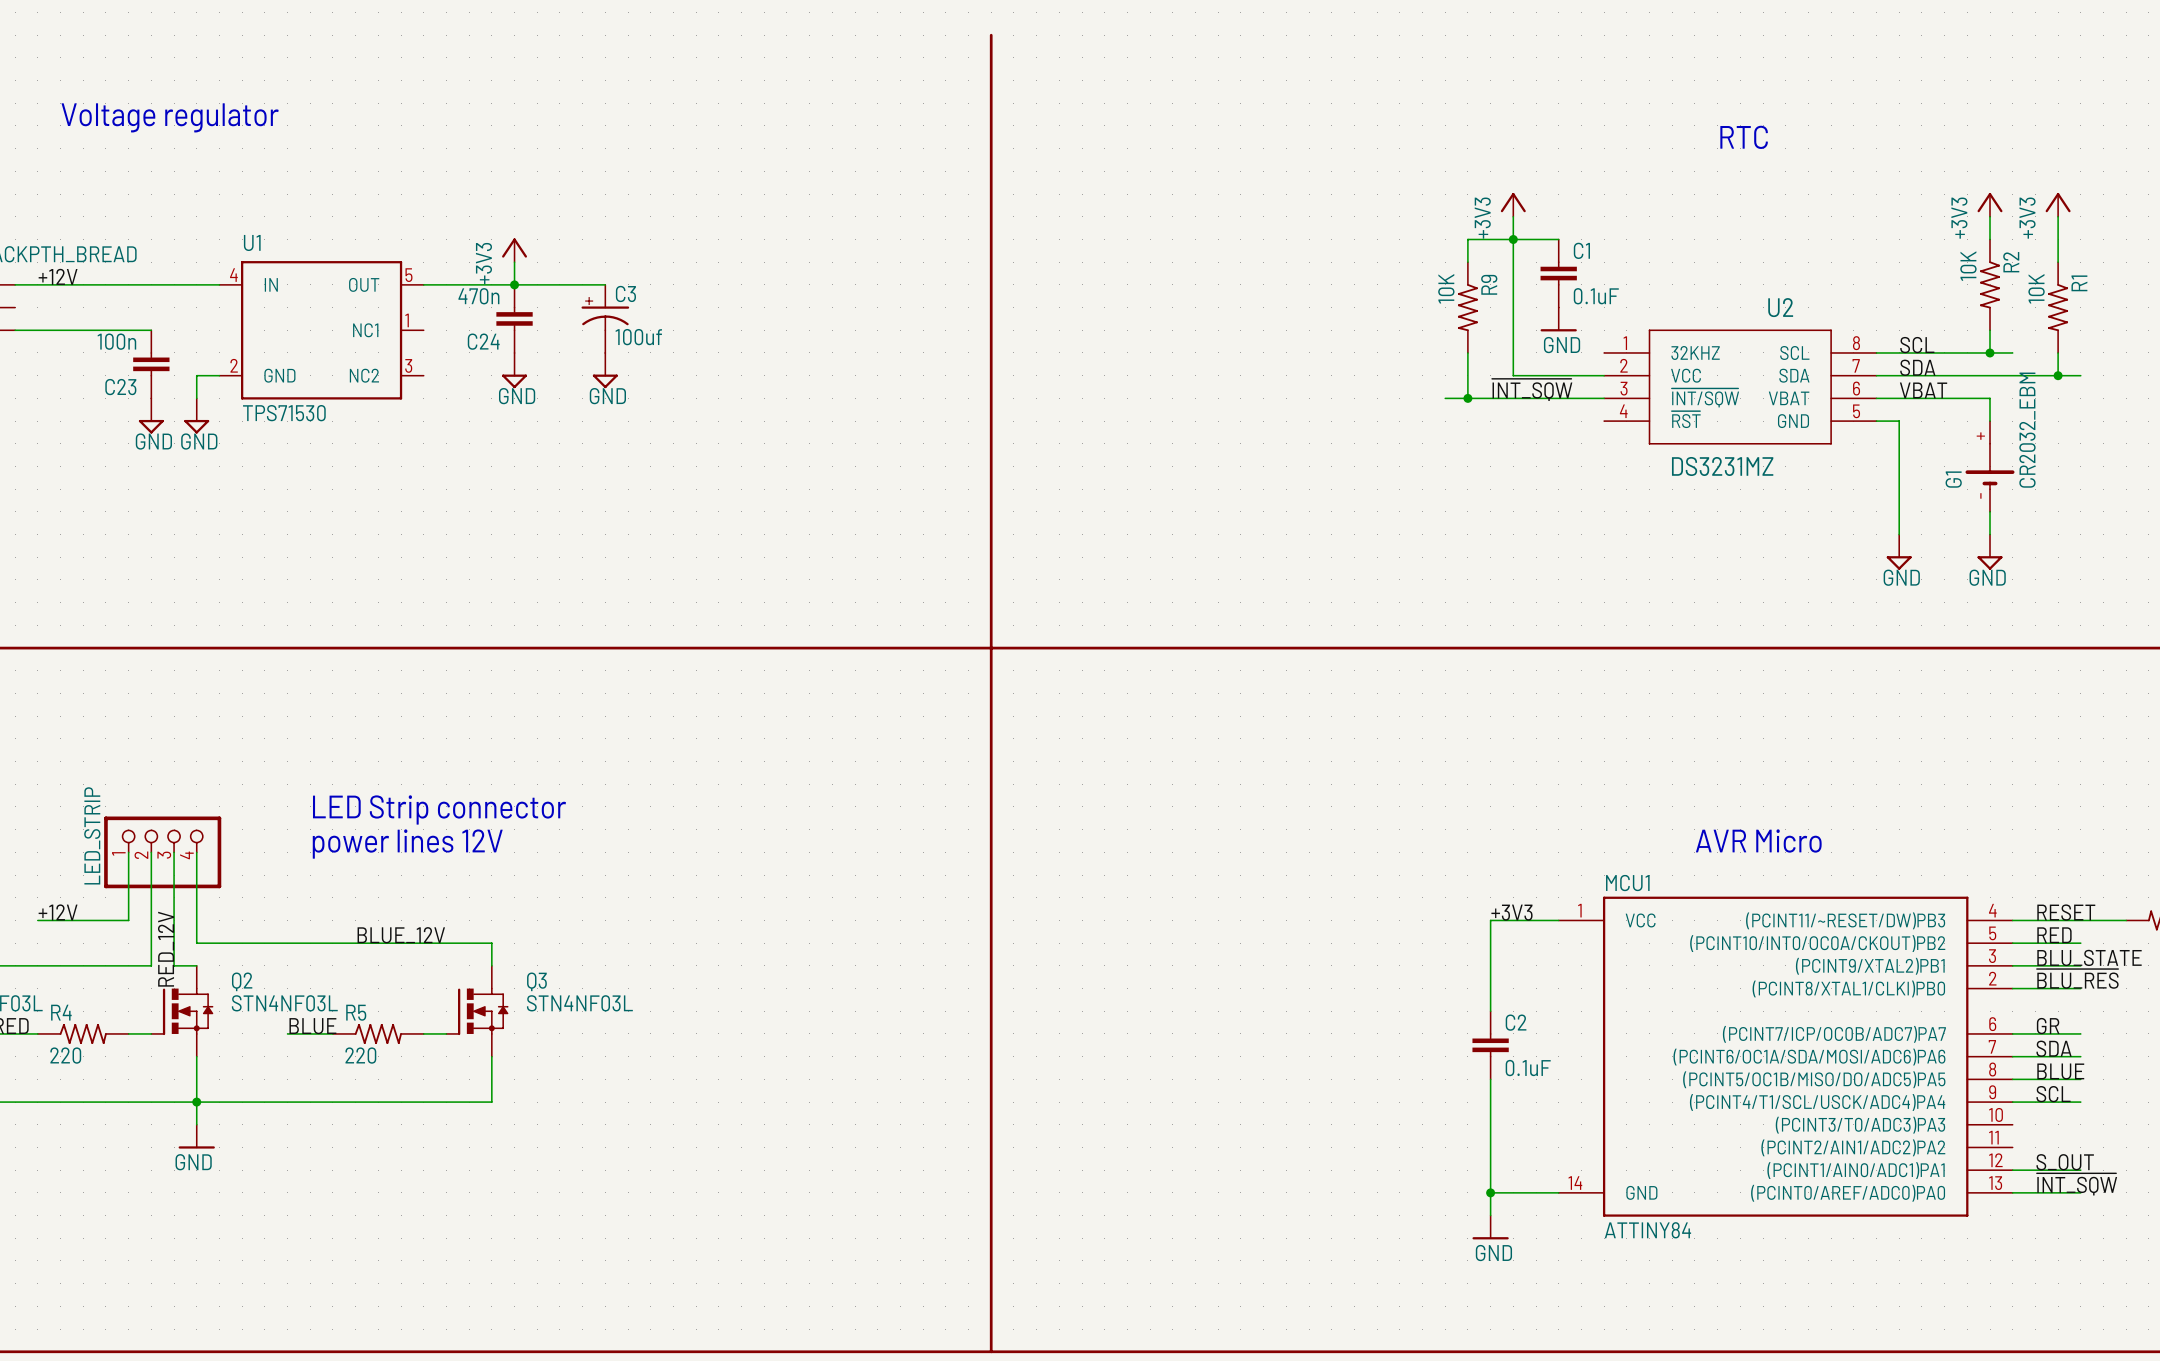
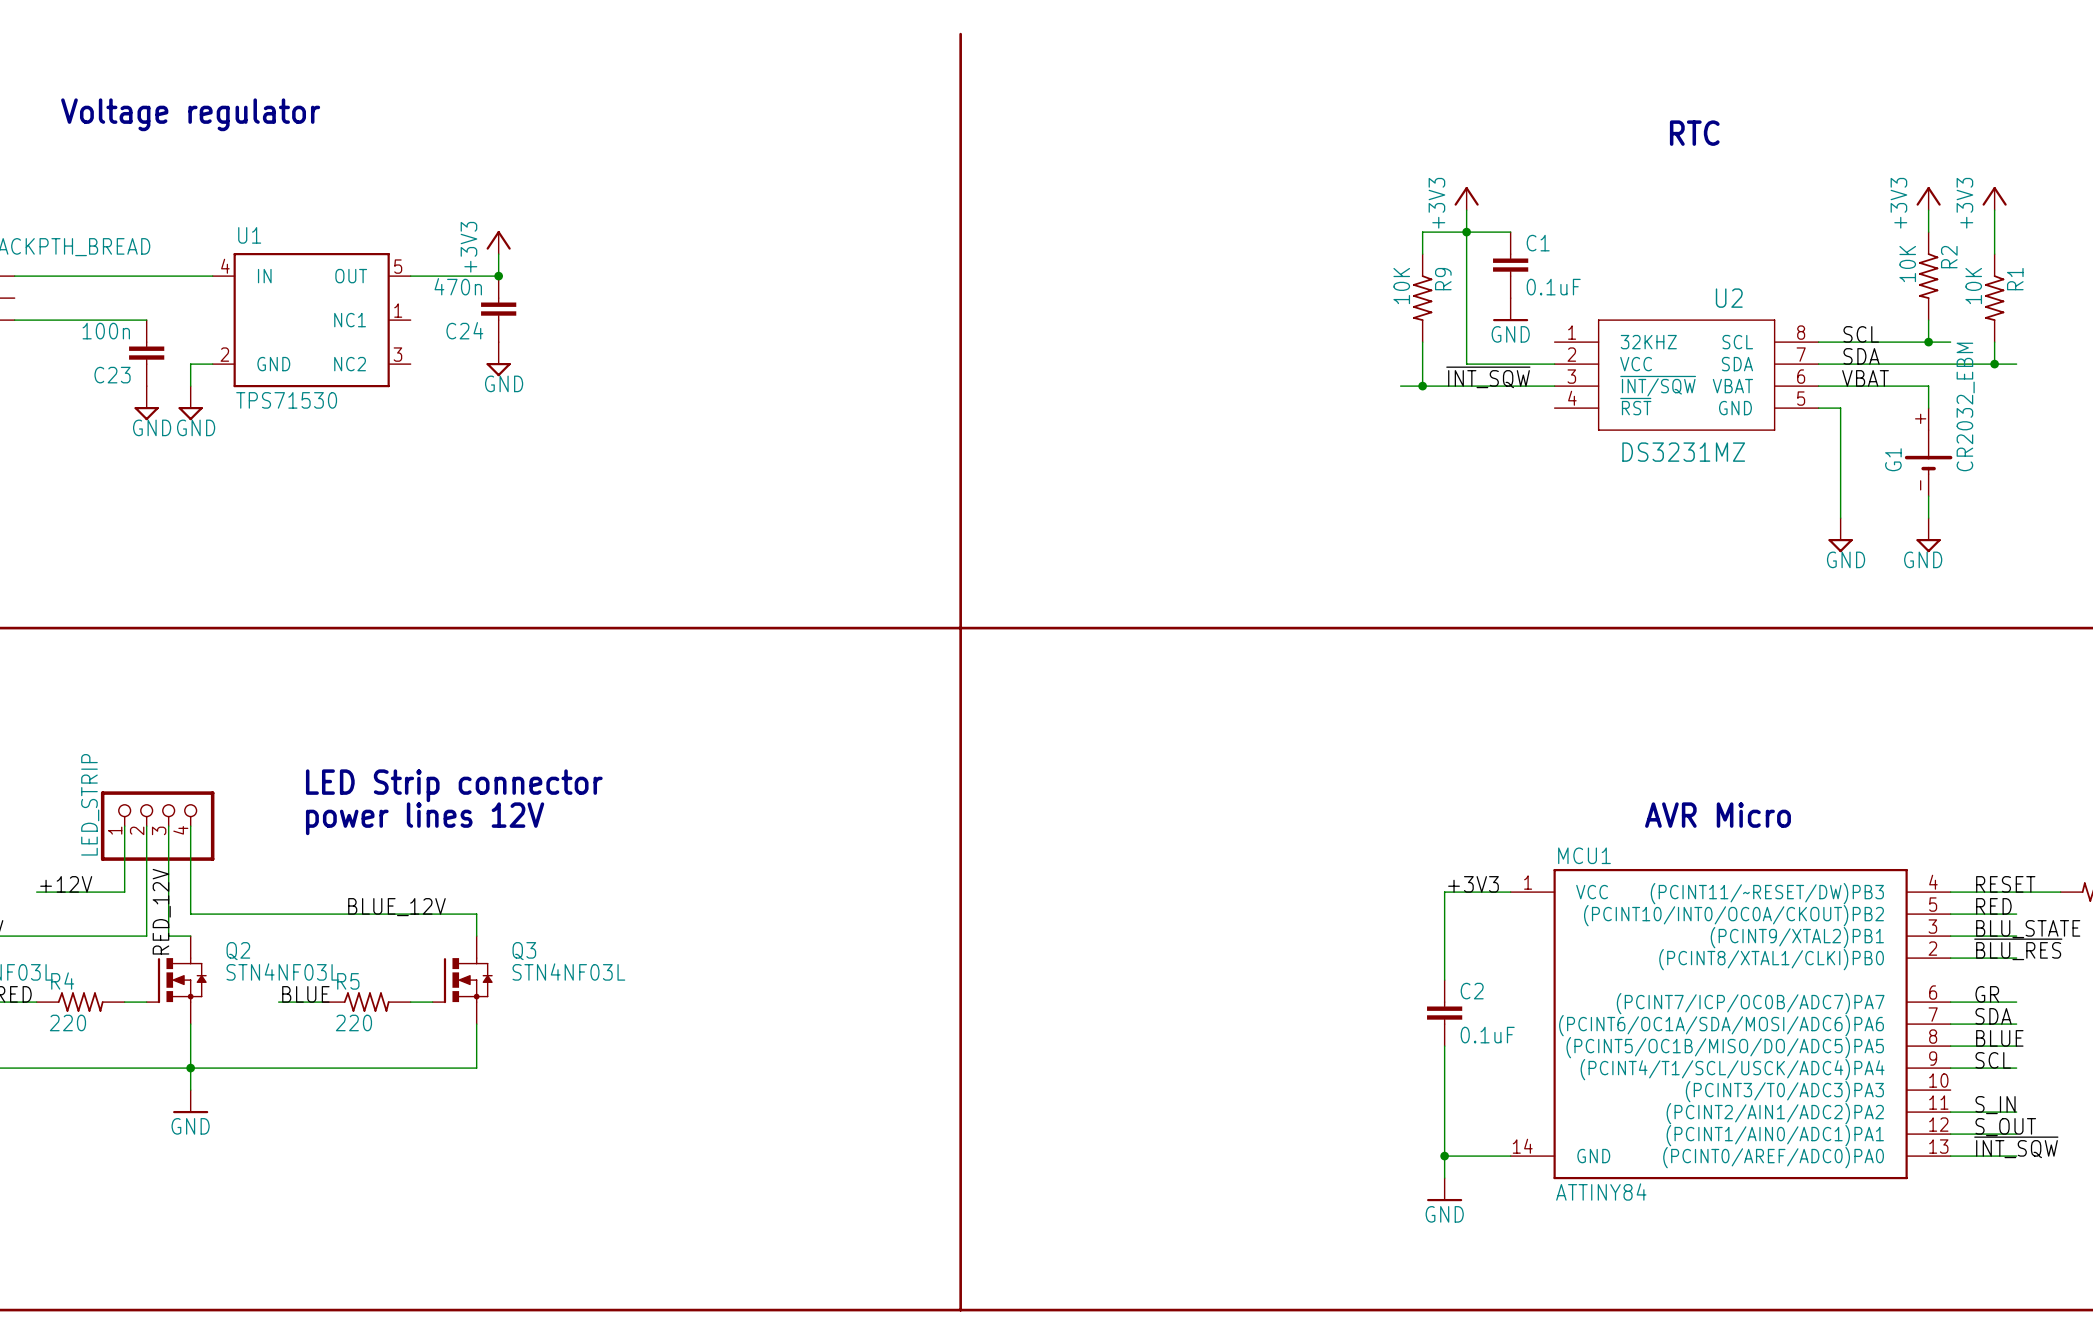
label: +12V (58, 276) -> none
wire: (514, 284) (605, 284) -> none
C3: 100uf (605, 318) -> none
power symbol: GND (605, 370) -> none
label: none -> S_IN (1995, 1105)
wire: none -> (1950, 1112) (2016, 1112)

